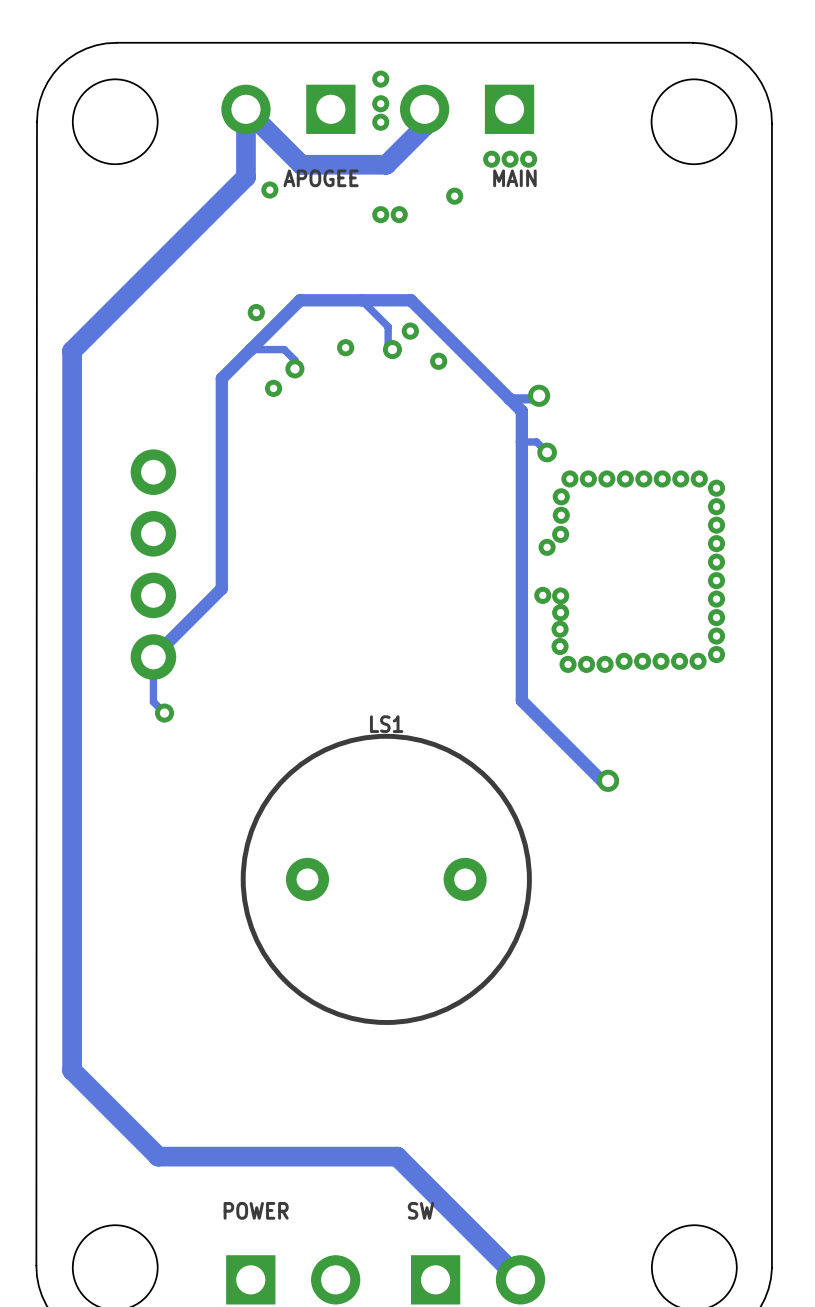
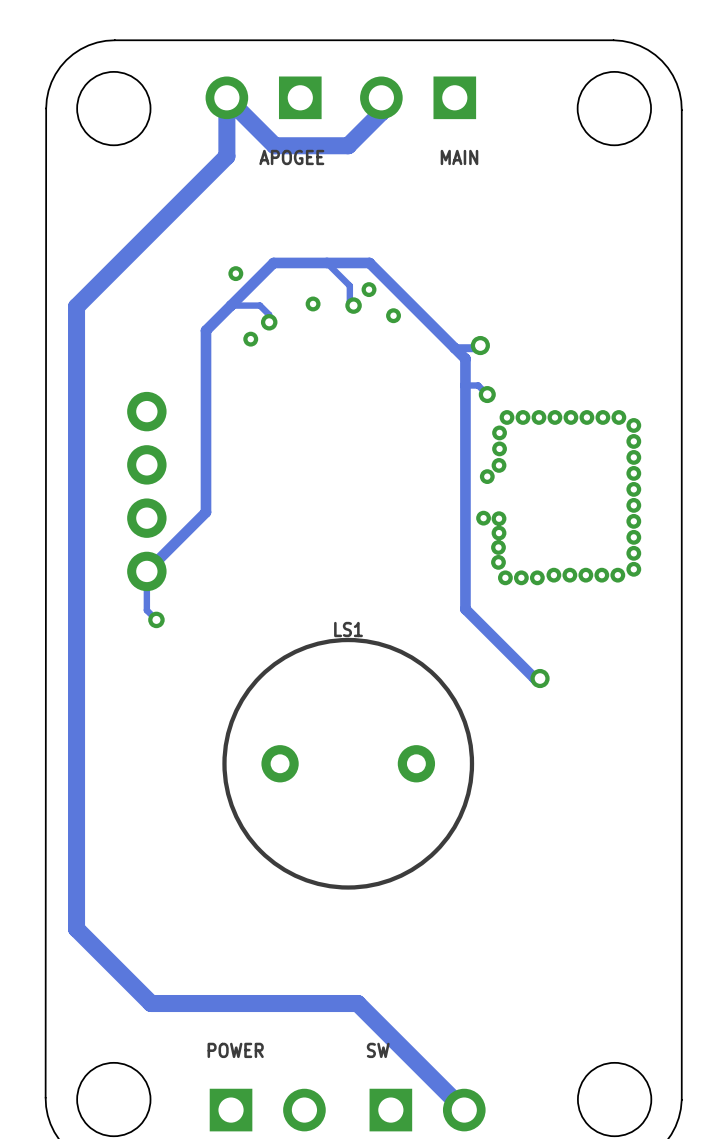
via: (380, 79) -> none
via: (380, 103) -> none
via: (380, 122) -> none
via: (491, 159) -> none
via: (510, 159) -> none
via: (528, 159) -> none
via: (269, 190) -> none
via: (454, 196) -> none
via: (380, 214) -> none
via: (399, 214) -> none

